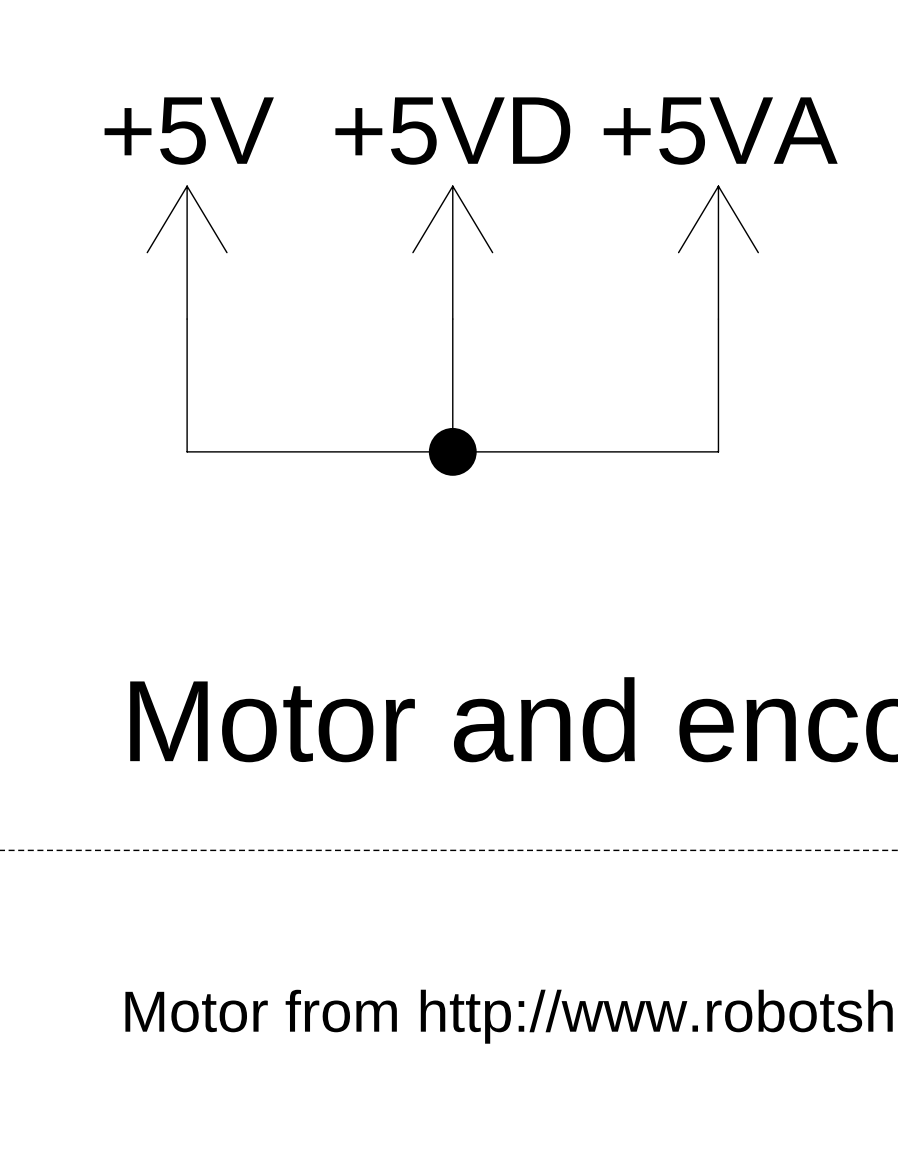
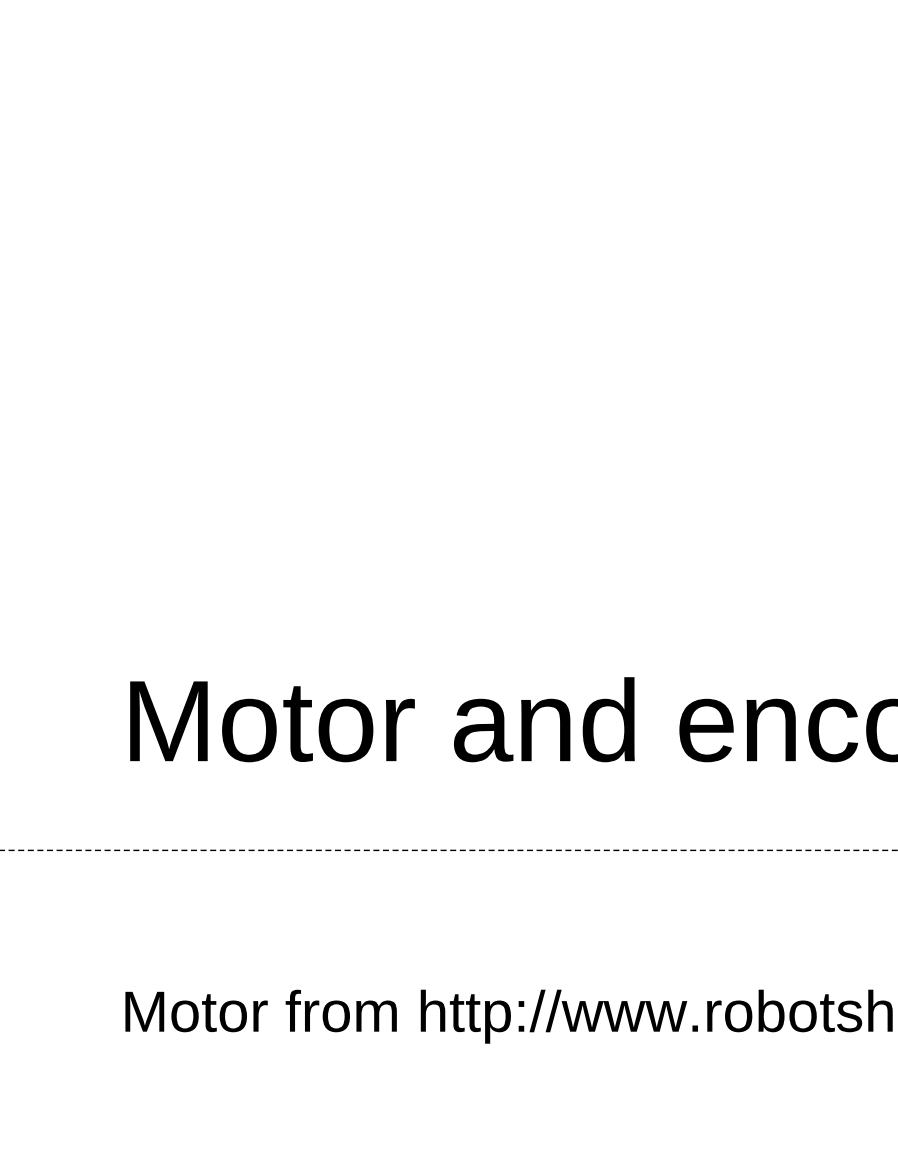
power symbol: +5V (187, 252) -> none
power symbol: +5VD (452, 252) -> none
power symbol: +5VA (718, 252) -> none
wire: (187, 319) (187, 451) (718, 451) (718, 319) -> none
wire: (452, 319) (452, 451) -> none
junction: (452, 451) -> none

